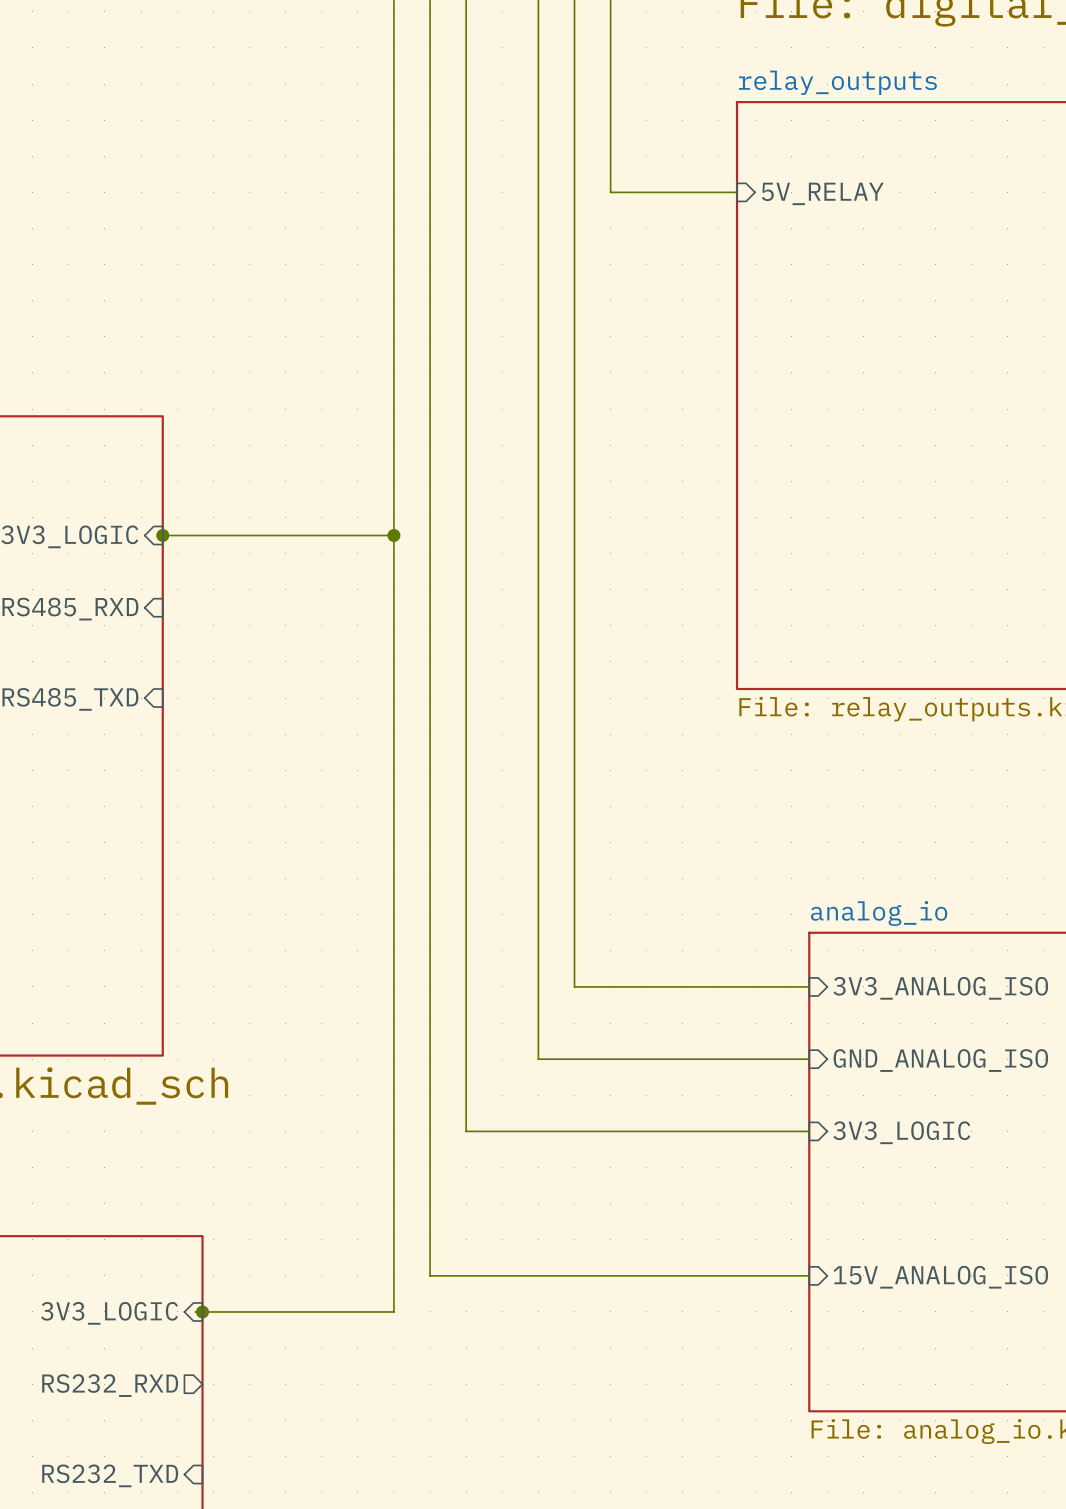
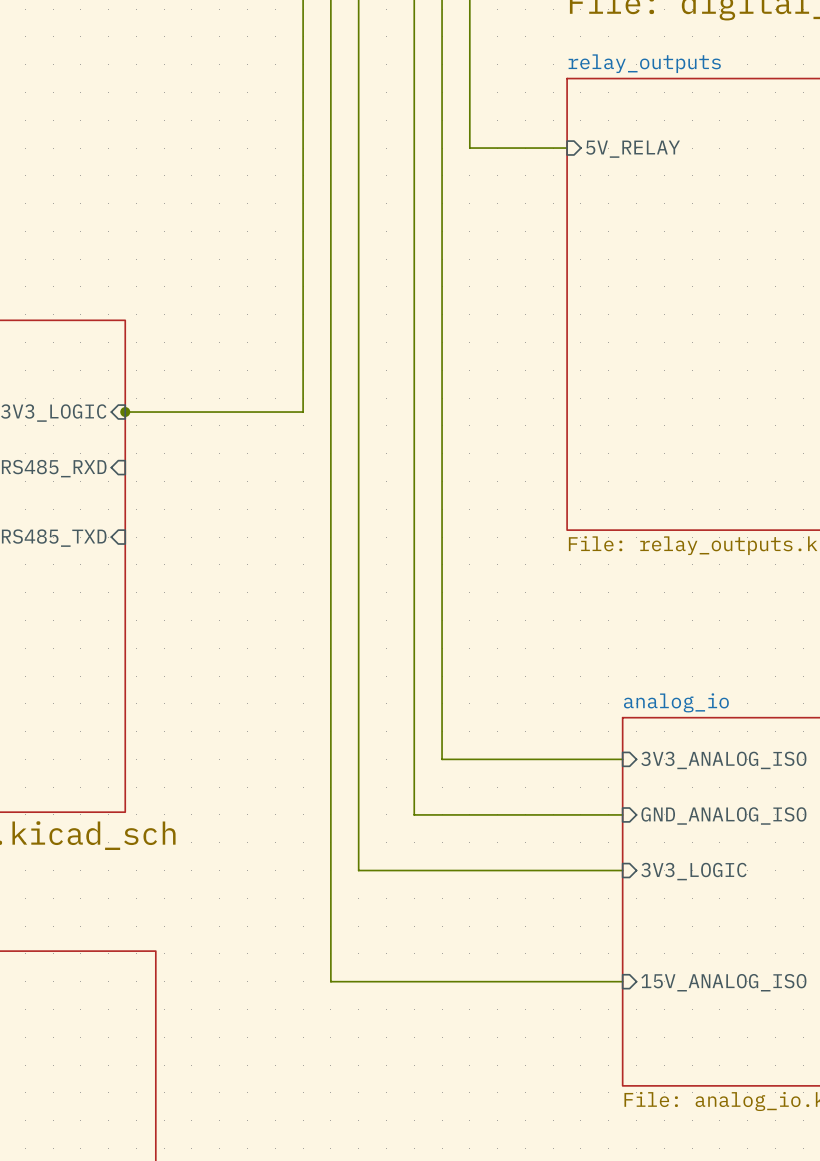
wire: (393, 535) (393, 1311) (195, 1311) -> none
junction: (393, 535) -> none
junction: (202, 1311) -> none
sheet pin: 3V3_LOGIC (109, 1313) -> none
sheet pin: RS232_RXD (110, 1385) -> none
sheet pin: RS232_TXD (110, 1475) -> none

